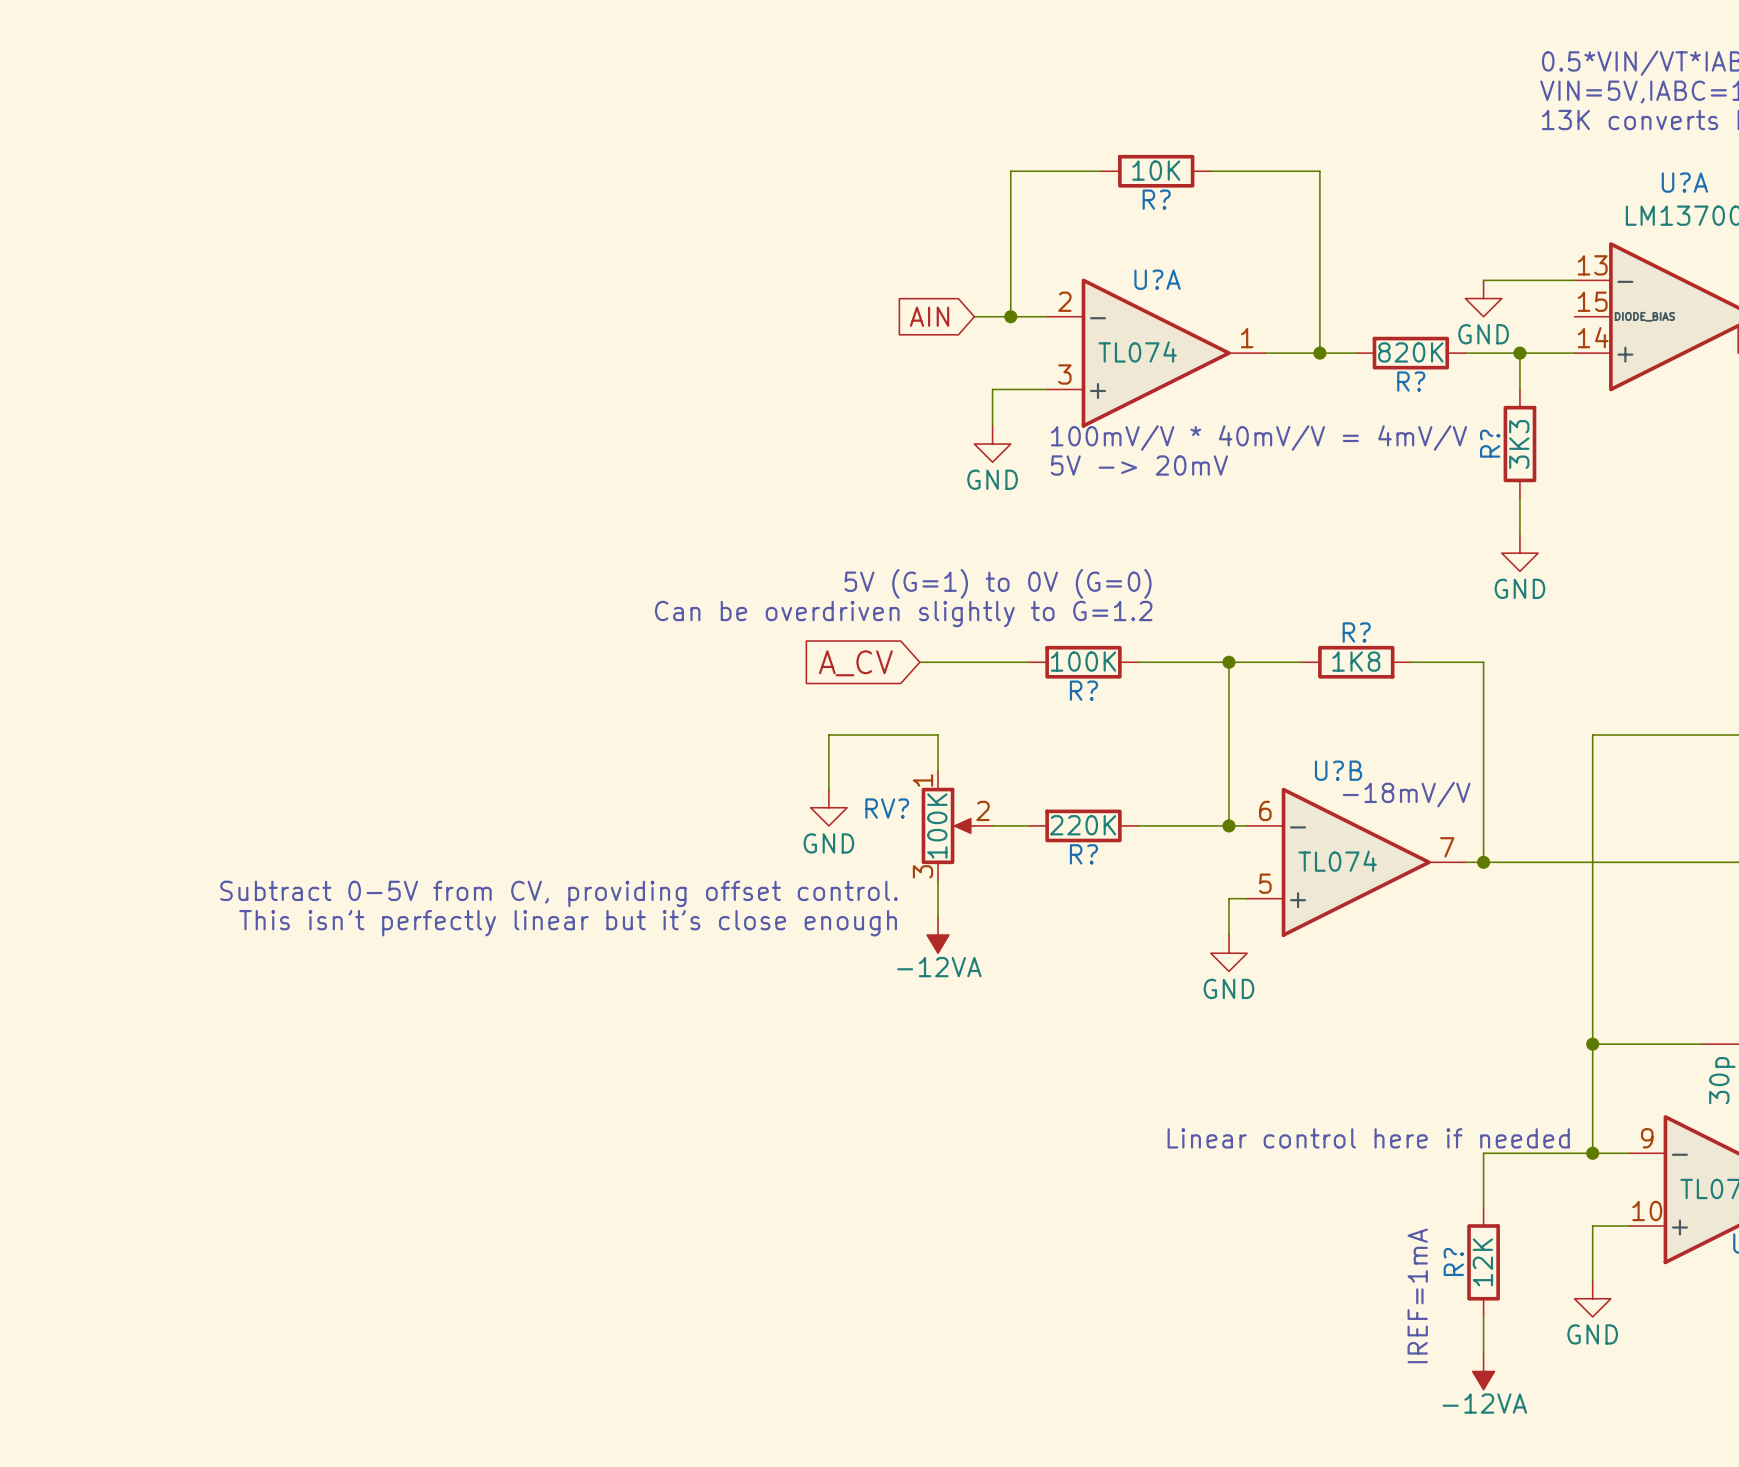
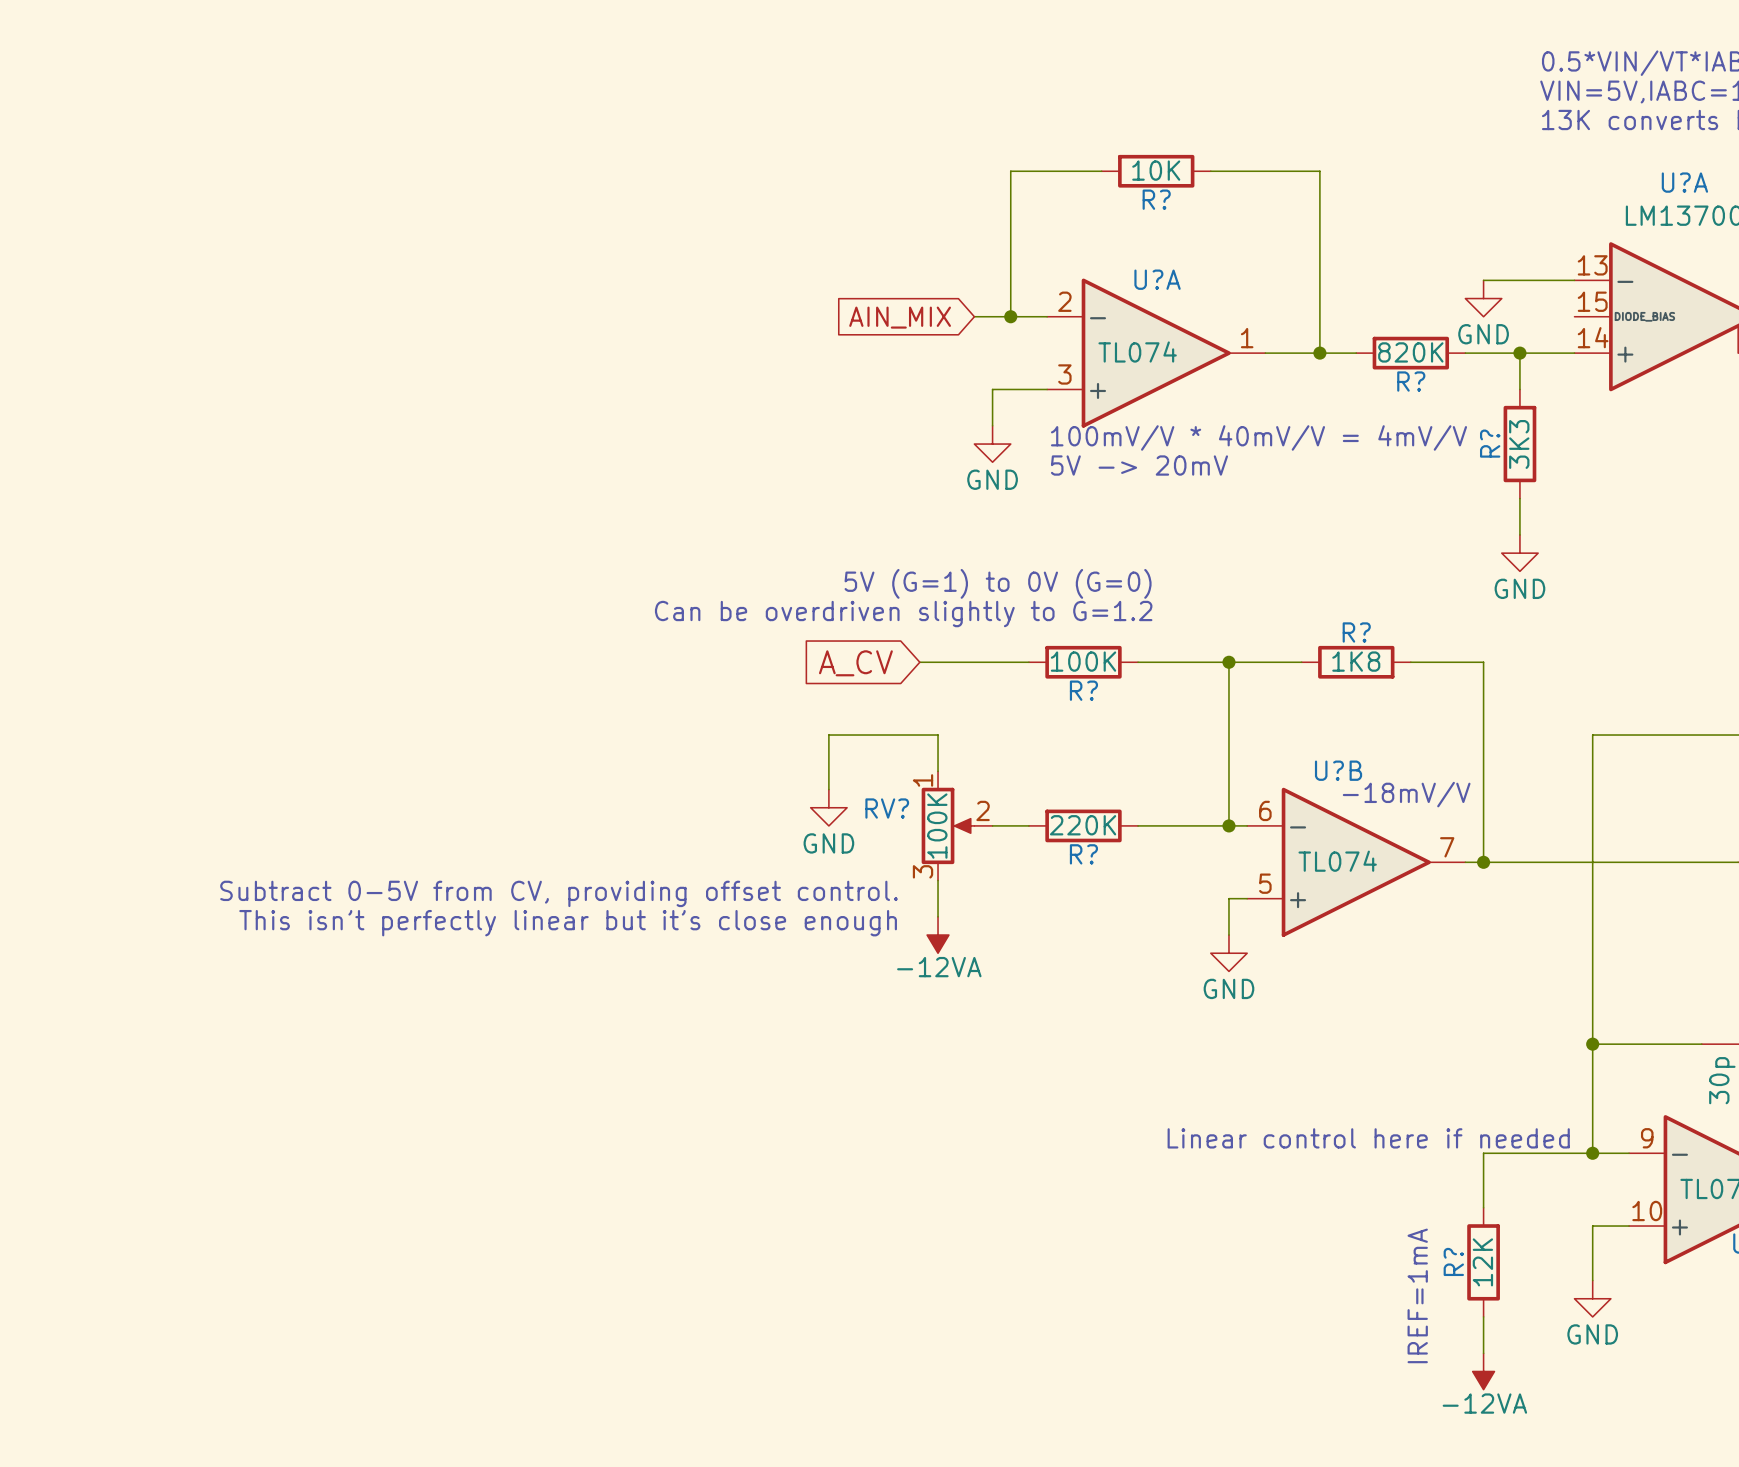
global label: AIN (929, 316) -> AIN_MIX (900, 317)

